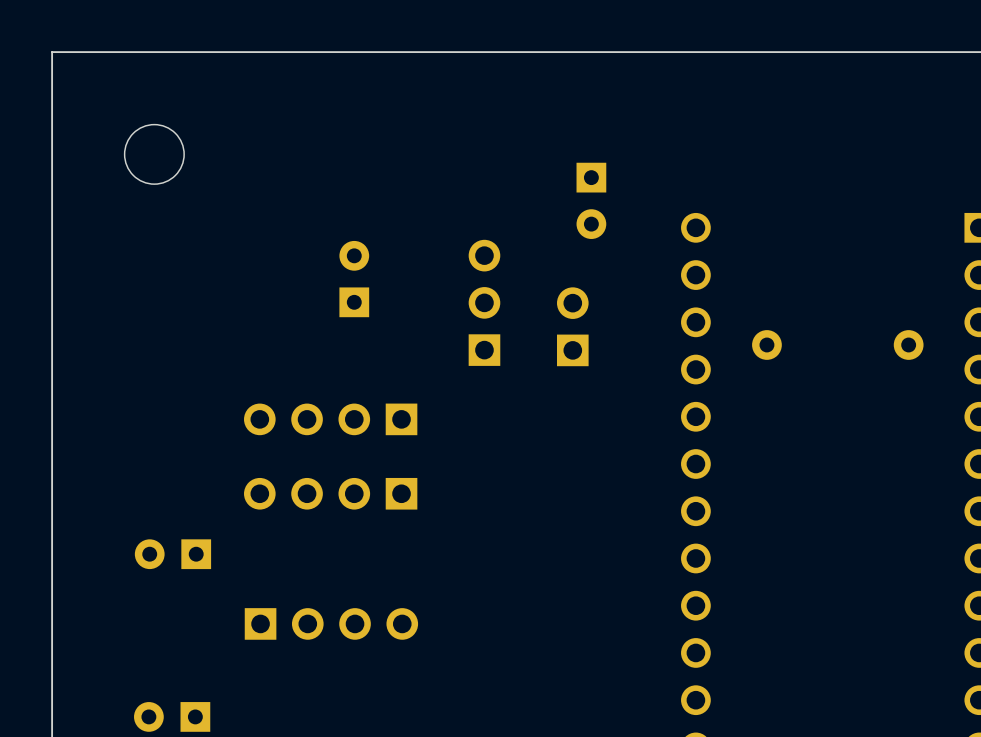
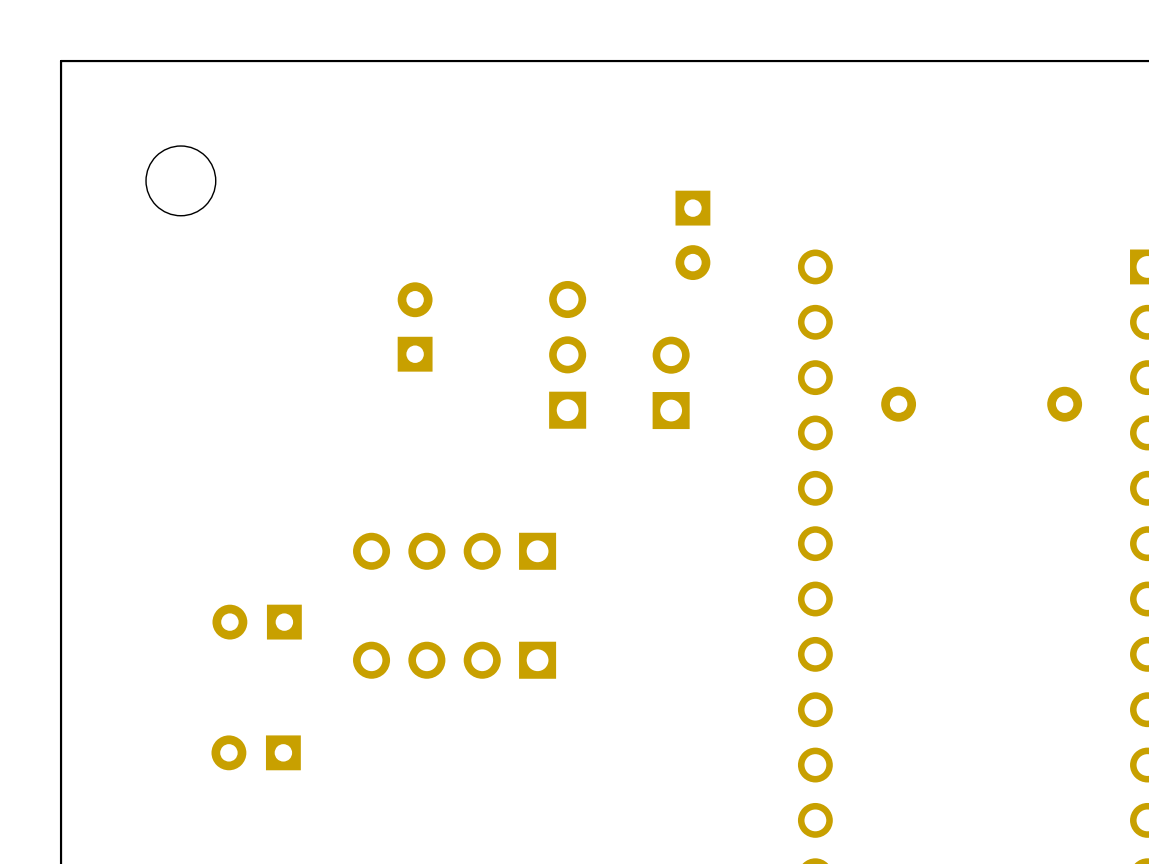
part: (330, 419) -> none
part: none -> (454, 551)
part: (330, 493) -> none
part: none -> (257, 622)
part: (172, 554) -> none
part: none -> (454, 660)
part: (331, 623) -> none
part: none -> (256, 752)
part: (172, 716) -> none

